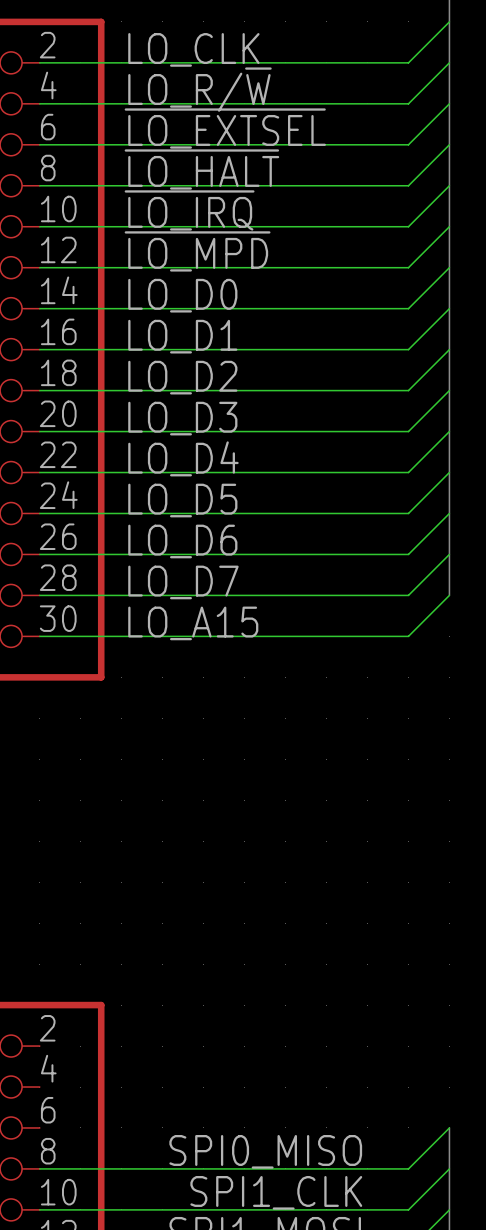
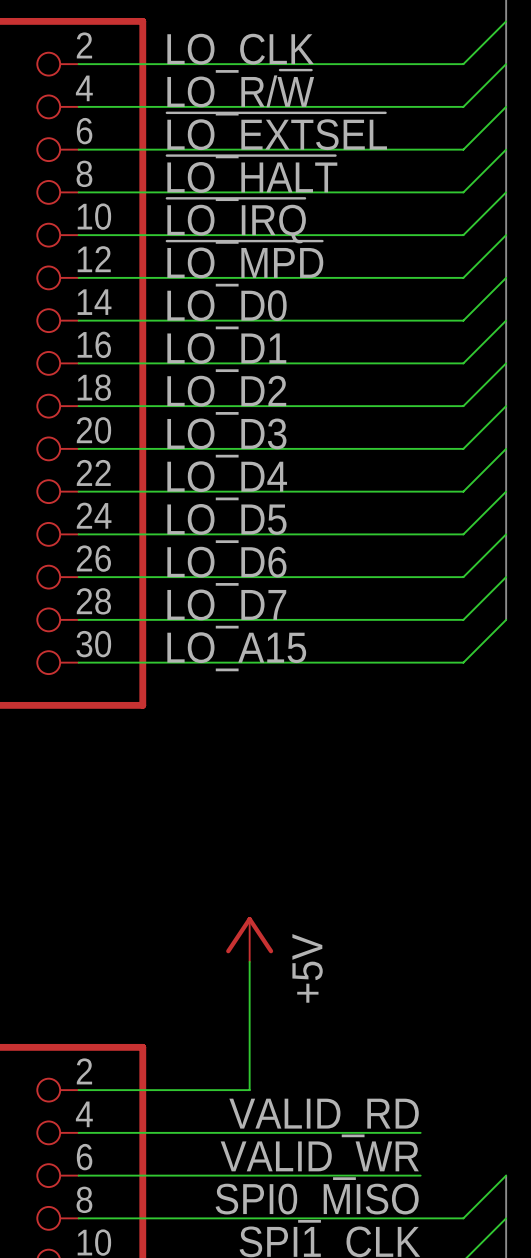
power symbol: none -> +5V (249, 939)
wire: none -> (249, 961) (249, 1090) (78, 1090)
label: none -> VALID_RD (324, 1117)
wire: none -> (78, 1132) (420, 1132)
label: none -> VALID_WR (319, 1160)
wire: none -> (78, 1175) (420, 1175)

